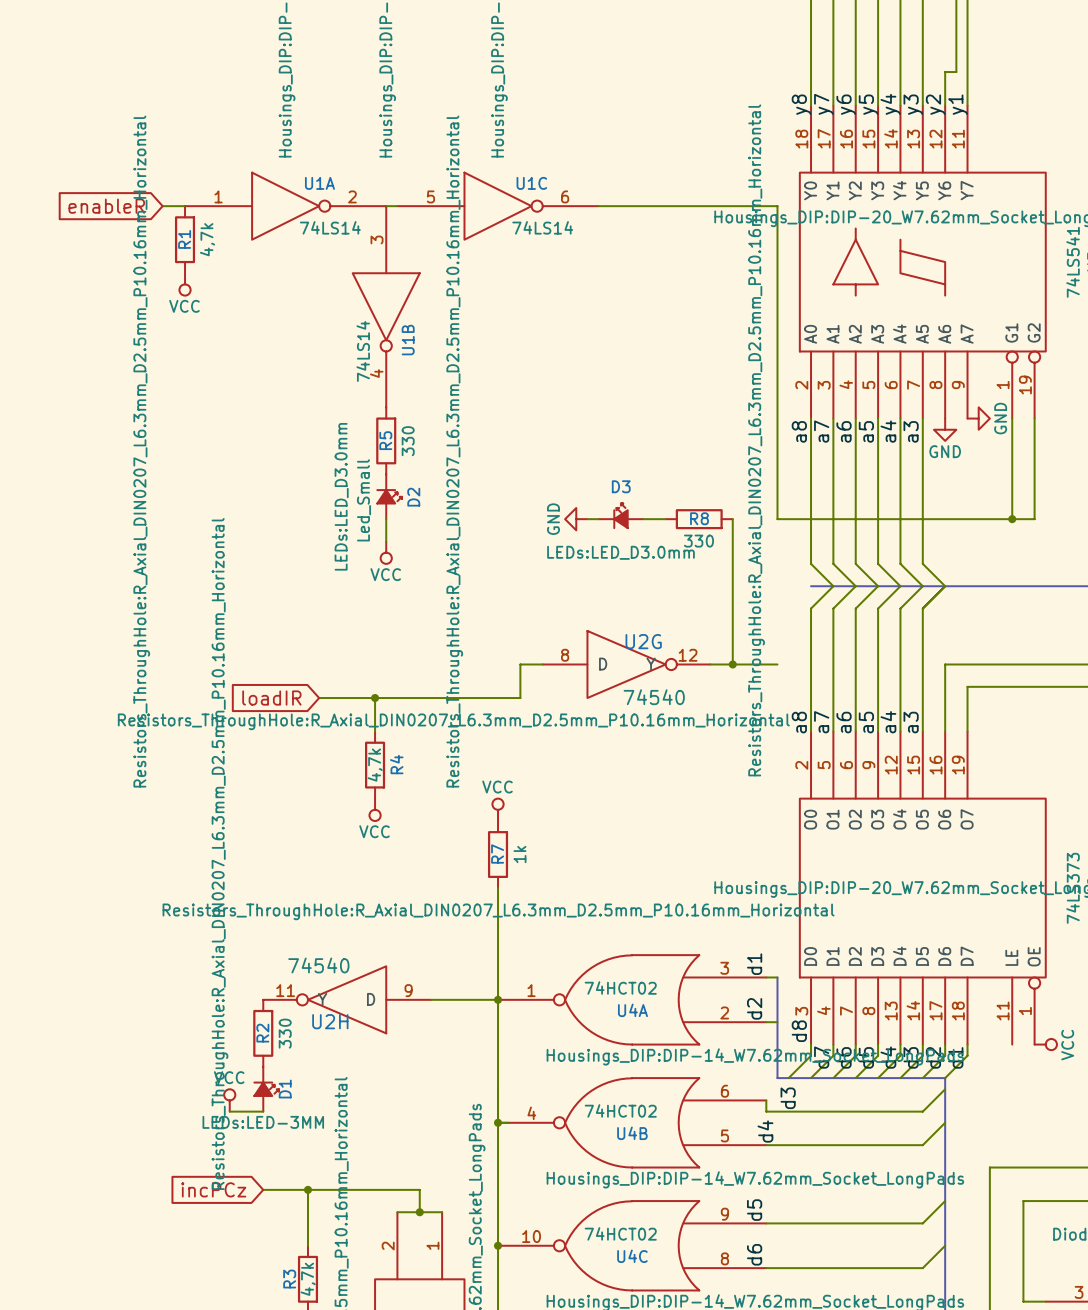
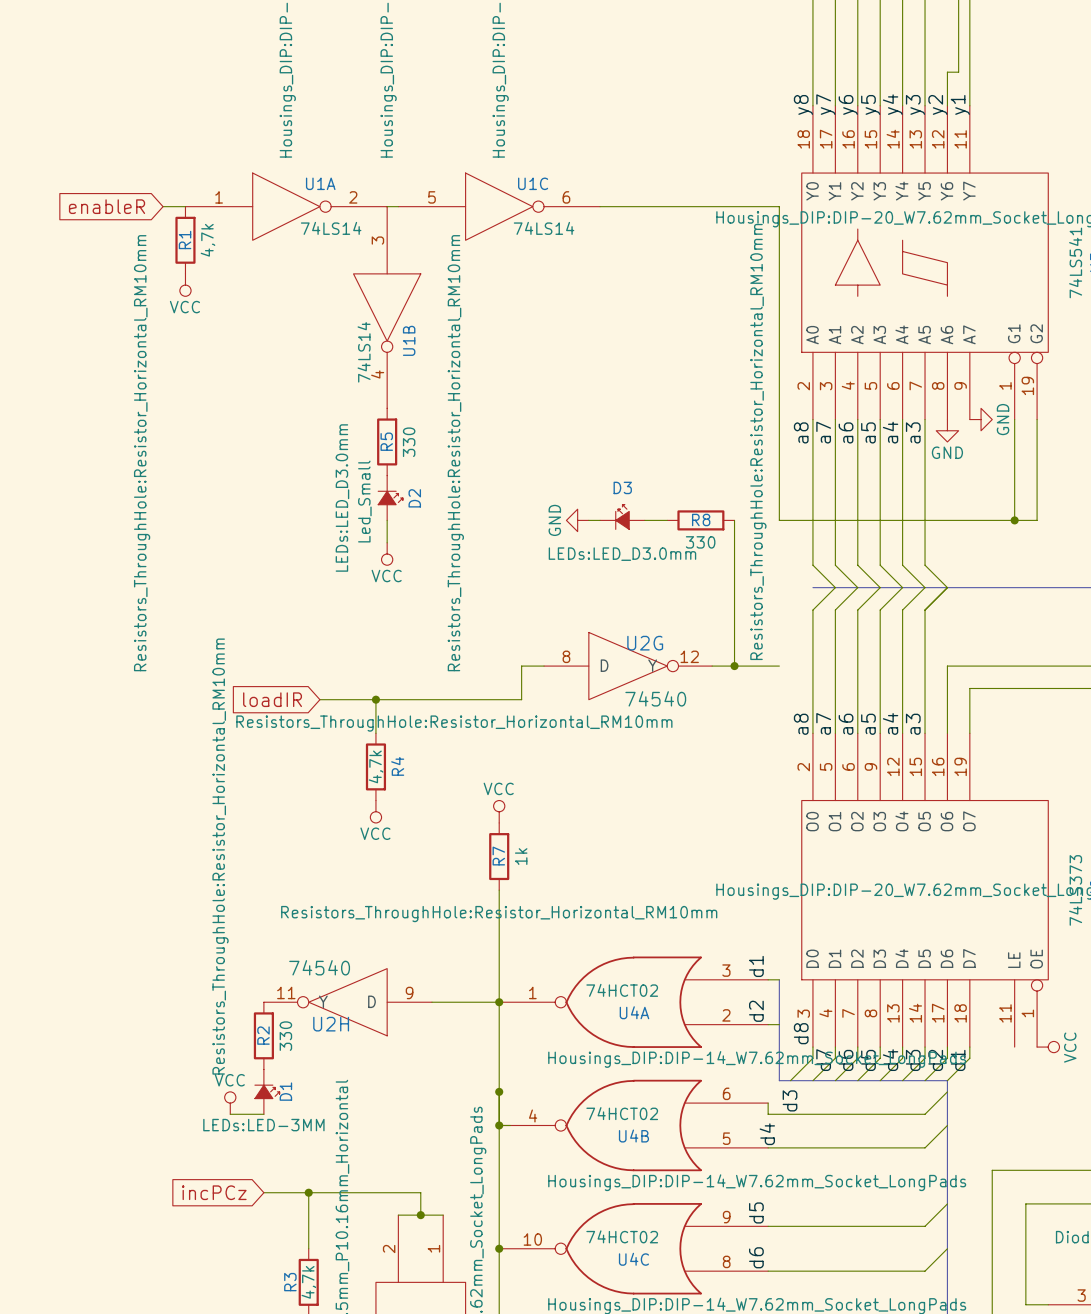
R8 text: Resistors_ThroughHole:R_Axial_DIN0207_L6.3mm_D2.5mm_P10.16mm_Horizontal (756, 440) -> Resistors_ThroughHole:Resistor_Horizontal_RM10mm (758, 441)
R1 text: Resistors_ThroughHole:R_Axial_DIN0207_L6.3mm_D2.5mm_P10.16mm_Horizontal (141, 451) -> Resistors_ThroughHole:Resistor_Horizontal_RM10mm (142, 453)
R5 text: Resistors_ThroughHole:R_Axial_DIN0207_L6.3mm_D2.5mm_P10.16mm_Horizontal (454, 451) -> Resistors_ThroughHole:Resistor_Horizontal_RM10mm (455, 453)
R4 text: Resistors_ThroughHole:R_Axial_DIN0207_L6.3mm_D2.5mm_P10.16mm_Horizontal (453, 721) -> Resistors_ThroughHole:Resistor_Horizontal_RM10mm (454, 723)
R2 text: Resistors_ThroughHole:R_Axial_DIN0207_L6.3mm_D2.5mm_P10.16mm_Horizontal (220, 853) -> Resistors_ThroughHole:Resistor_Horizontal_RM10mm (220, 856)
R7 text: Resistors_ThroughHole:R_Axial_DIN0207_L6.3mm_D2.5mm_P10.16mm_Horizontal (498, 911) -> Resistors_ThroughHole:Resistor_Horizontal_RM10mm (499, 914)
junction: none -> (499, 1091)

